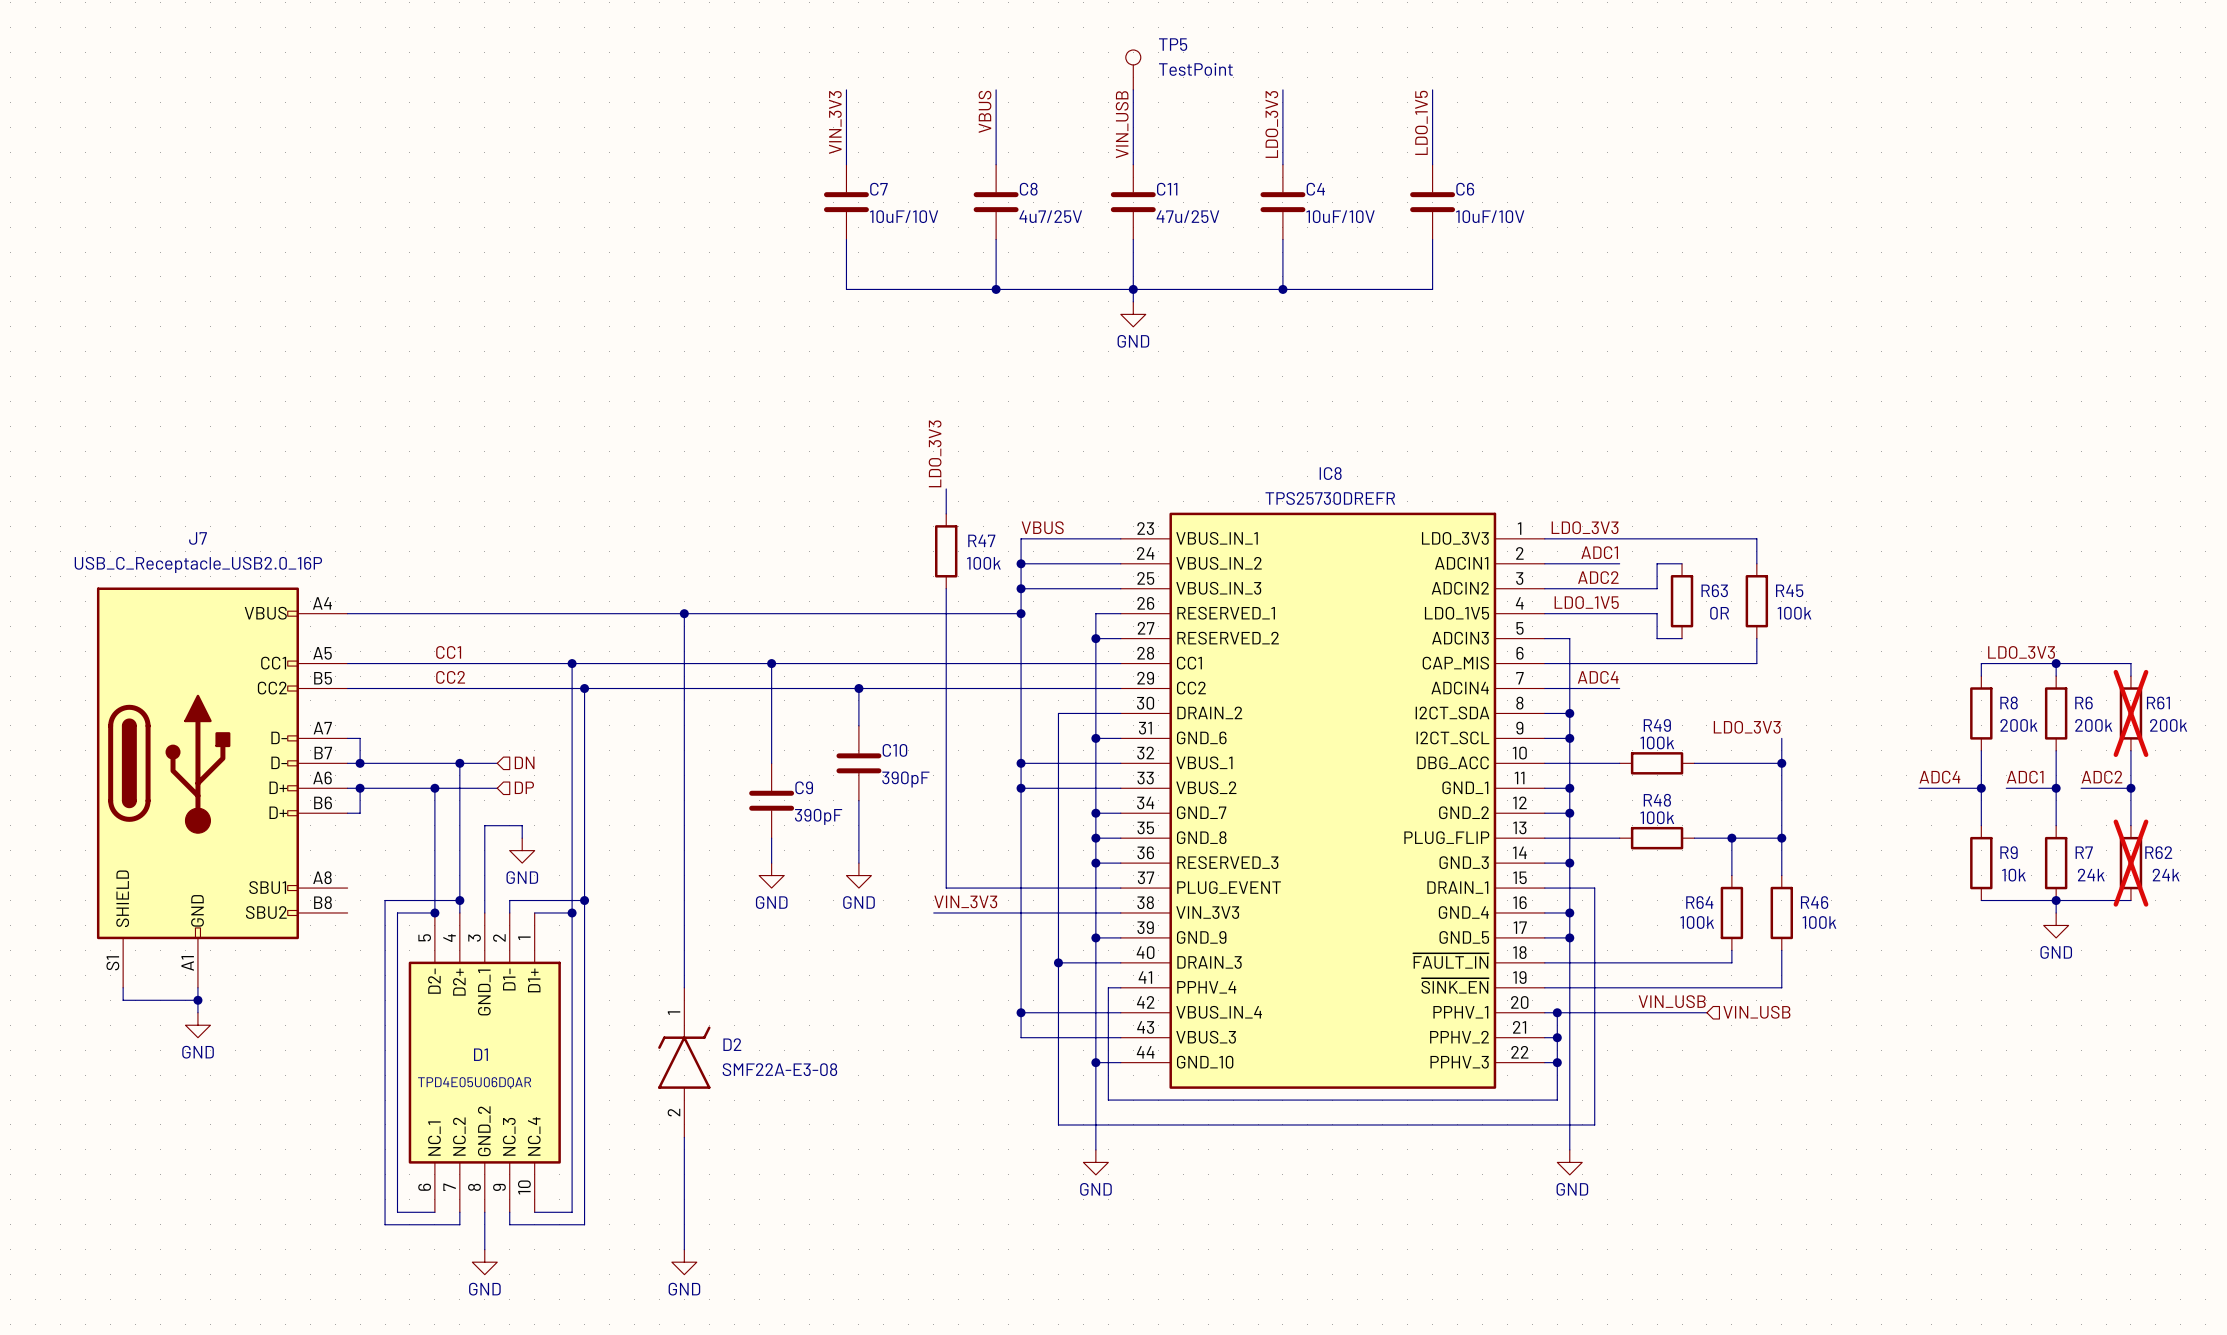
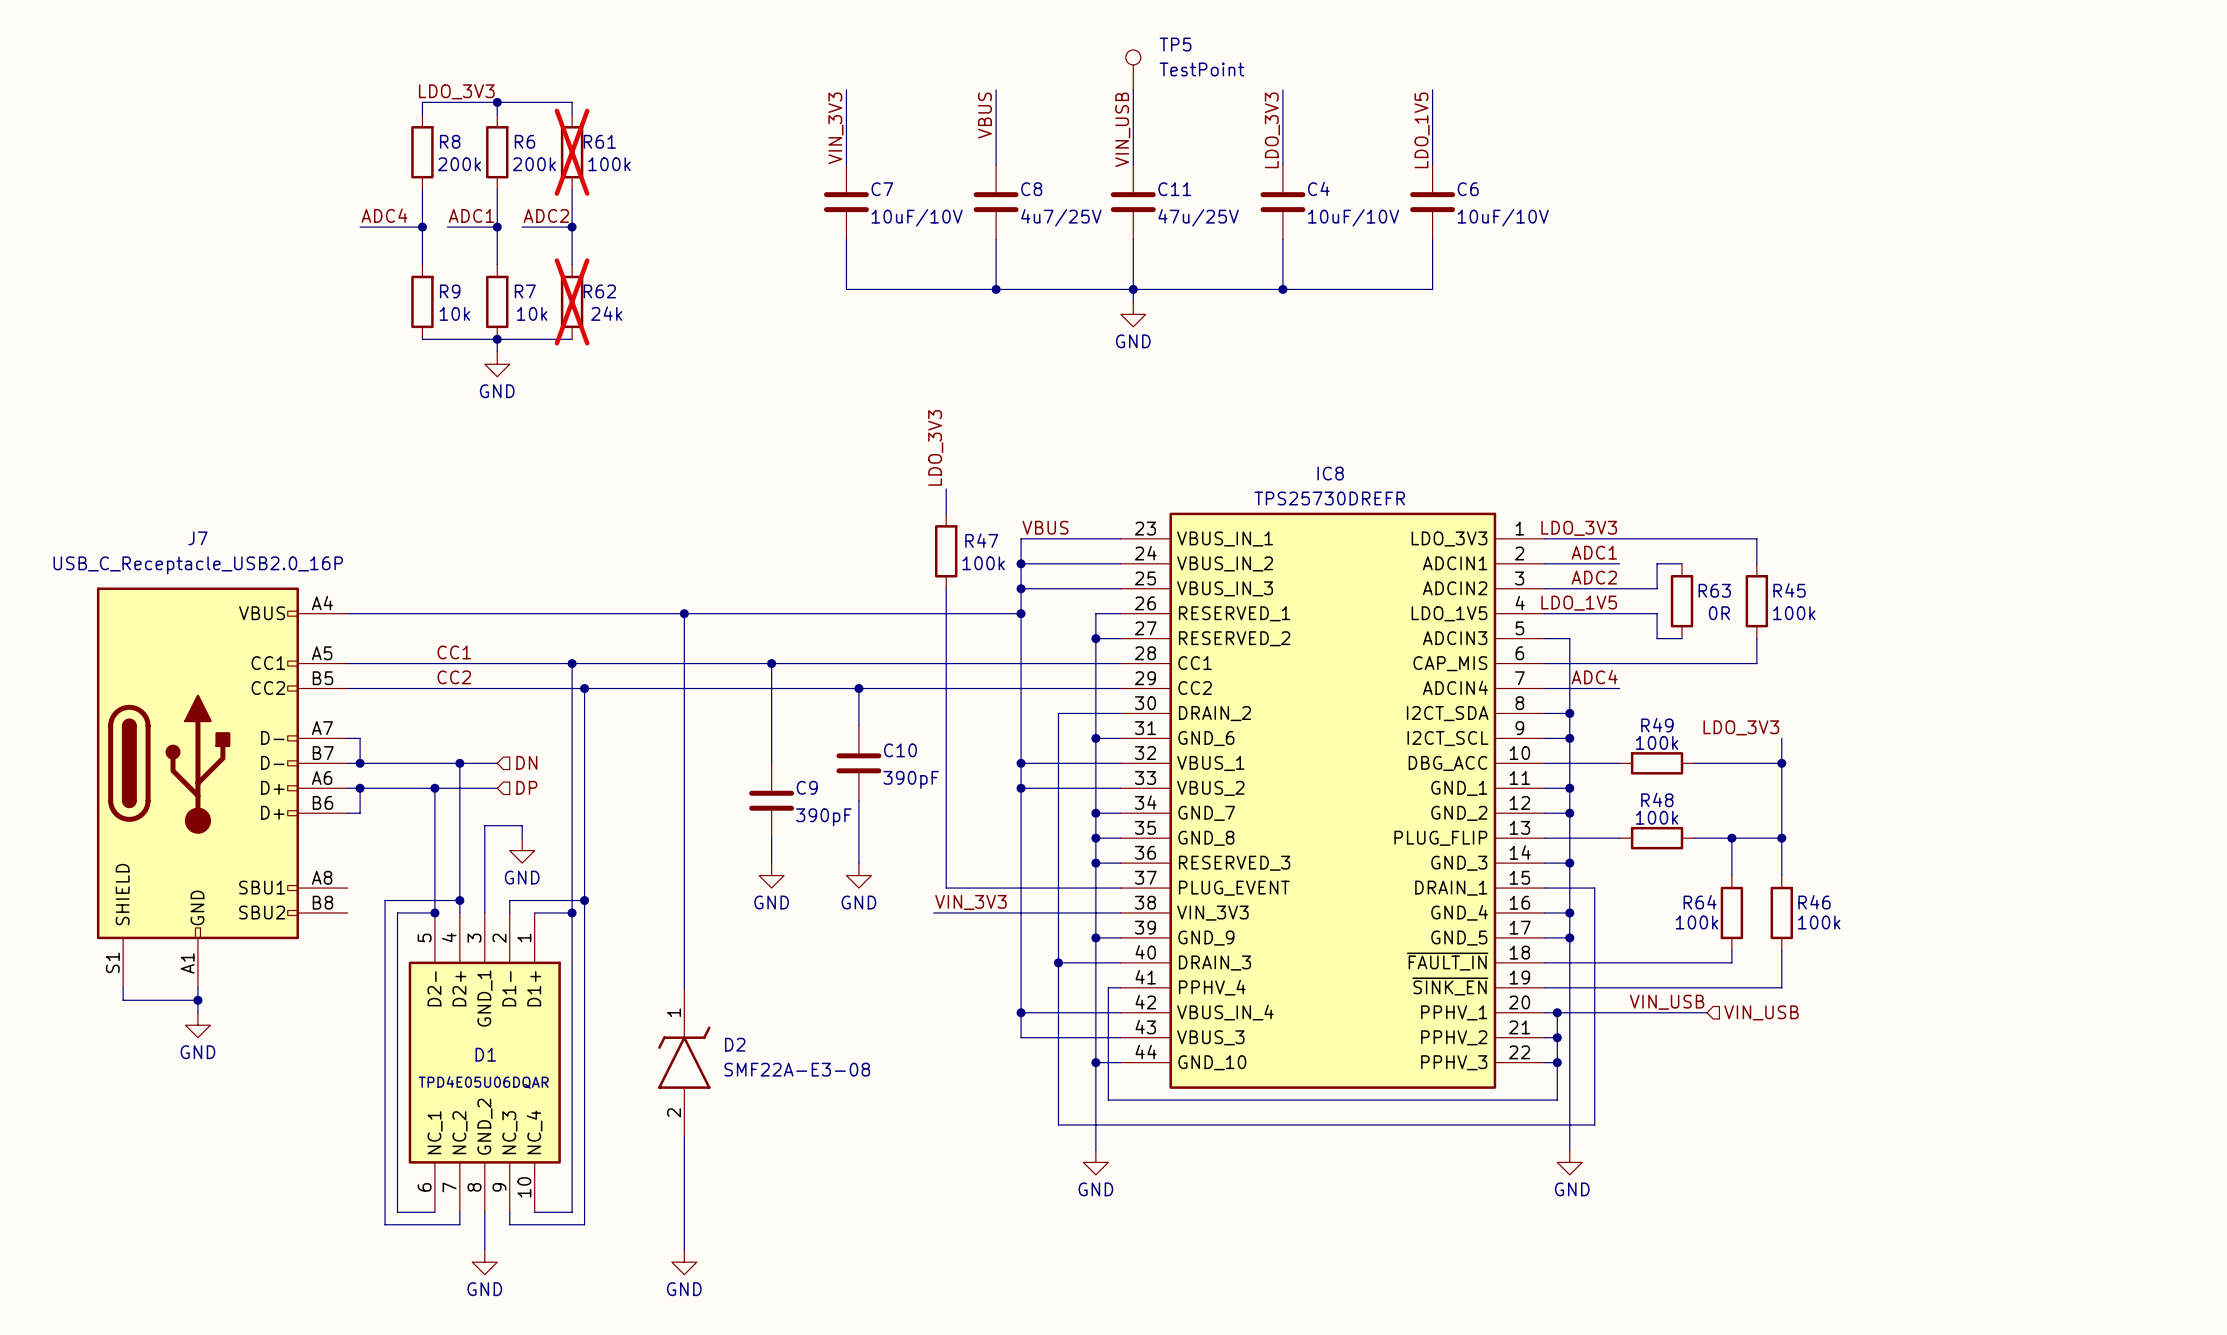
label: none -> LDO_3V3 (456, 91)
wire: none -> (497, 102) (497, 114)
junction: none -> (497, 102)
wire: none -> (422, 114) (422, 102) (572, 102) (572, 114)
wire: none -> (422, 189) (422, 264)
wire: none -> (497, 189) (497, 264)
wire: none -> (572, 189) (572, 264)
label: none -> ADC4 (384, 215)
label: none -> ADC1 (471, 215)
label: none -> ADC2 (546, 215)
wire: none -> (360, 227) (422, 227)
junction: none -> (422, 227)
wire: none -> (447, 227) (497, 227)
junction: none -> (497, 227)
wire: none -> (522, 227) (572, 227)
junction: none -> (572, 227)
wire: none -> (422, 339) (572, 339)
wire: none -> (497, 339) (497, 351)
junction: none -> (497, 339)
power symbol: none -> GND (497, 364)
label: LDO_3V3 (2021, 652) -> none
wire: (2056, 663) (2056, 676) -> none
junction: (2056, 663) -> none
wire: (1981, 676) (1981, 663) (2130, 663) (2130, 676) -> none
R8 position: (1981, 713) -> (422, 152)
R6 position: (2056, 713) -> (497, 152)
R61 position: (2130, 713) -> (572, 152)
R61 value: 200k (2168, 725) -> 100k (609, 164)
wire: (1981, 750) (1981, 825) -> none
wire: (2056, 750) (2056, 825) -> none
wire: (2130, 750) (2130, 825) -> none
label: ADC4 (1939, 777) -> none
label: ADC1 (2025, 777) -> none
label: ADC2 (2101, 777) -> none
wire: (1918, 788) (1981, 788) -> none
junction: (1981, 788) -> none
wire: (2006, 788) (2056, 788) -> none
junction: (2056, 788) -> none
wire: (2081, 788) (2130, 788) -> none
junction: (2130, 788) -> none
R9 position: (1981, 863) -> (422, 301)
R7 position: (2056, 863) -> (497, 301)
R62 position: (2130, 863) -> (572, 301)
R7 value: 24k (2091, 875) -> 10k (532, 313)
wire: (1981, 900) (2130, 900) -> none
wire: (2056, 900) (2056, 912) -> none
junction: (2056, 900) -> none
power symbol: GND (2056, 925) -> none

